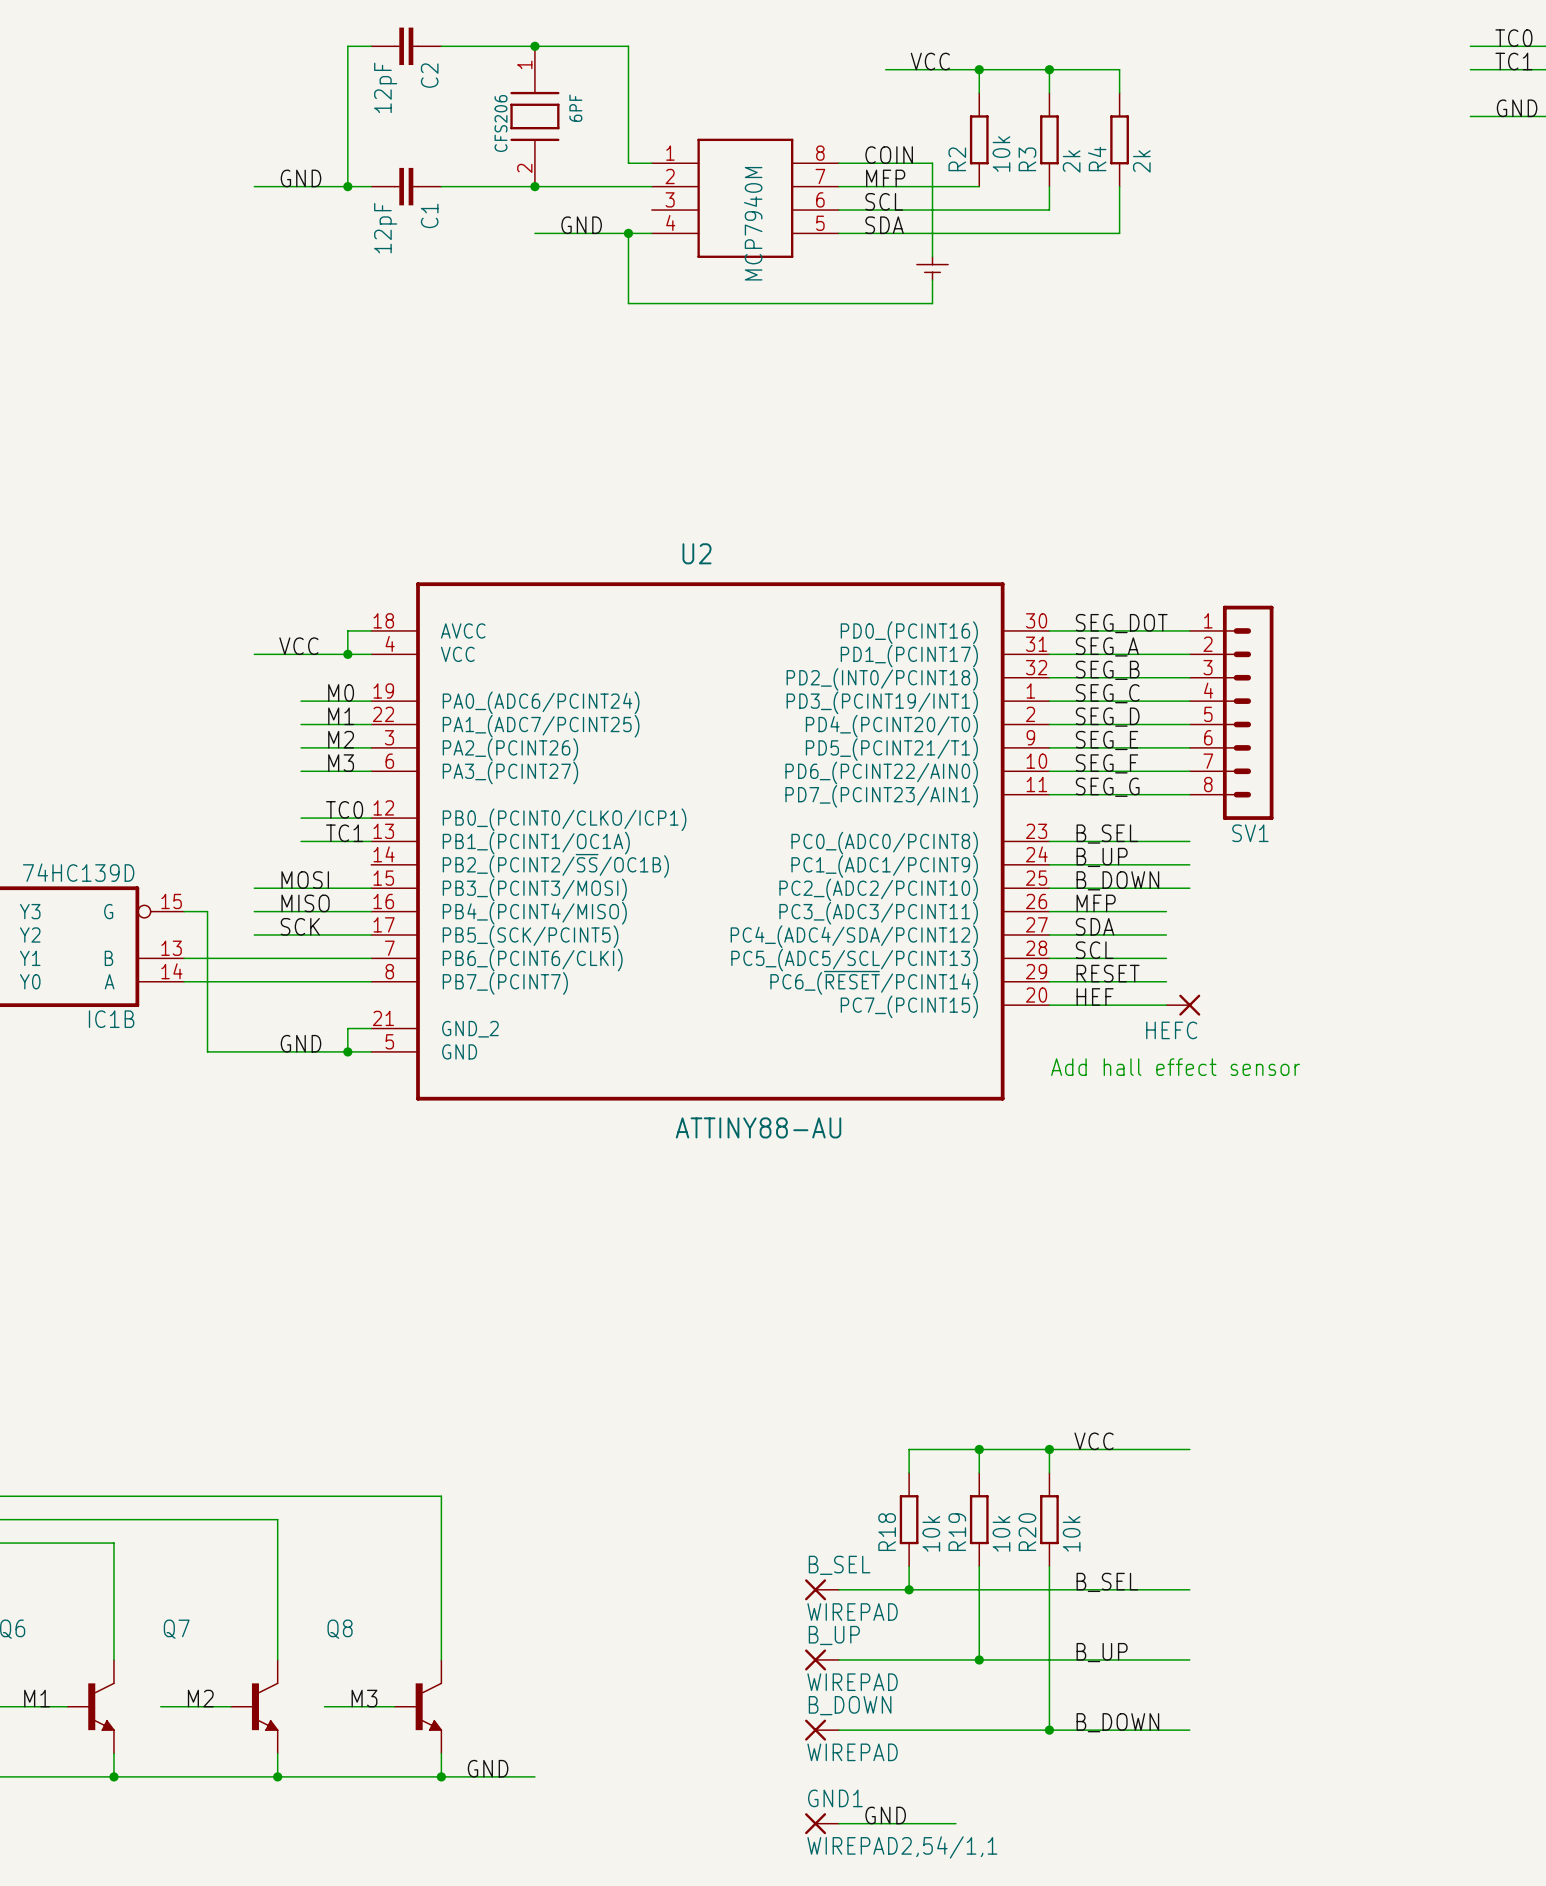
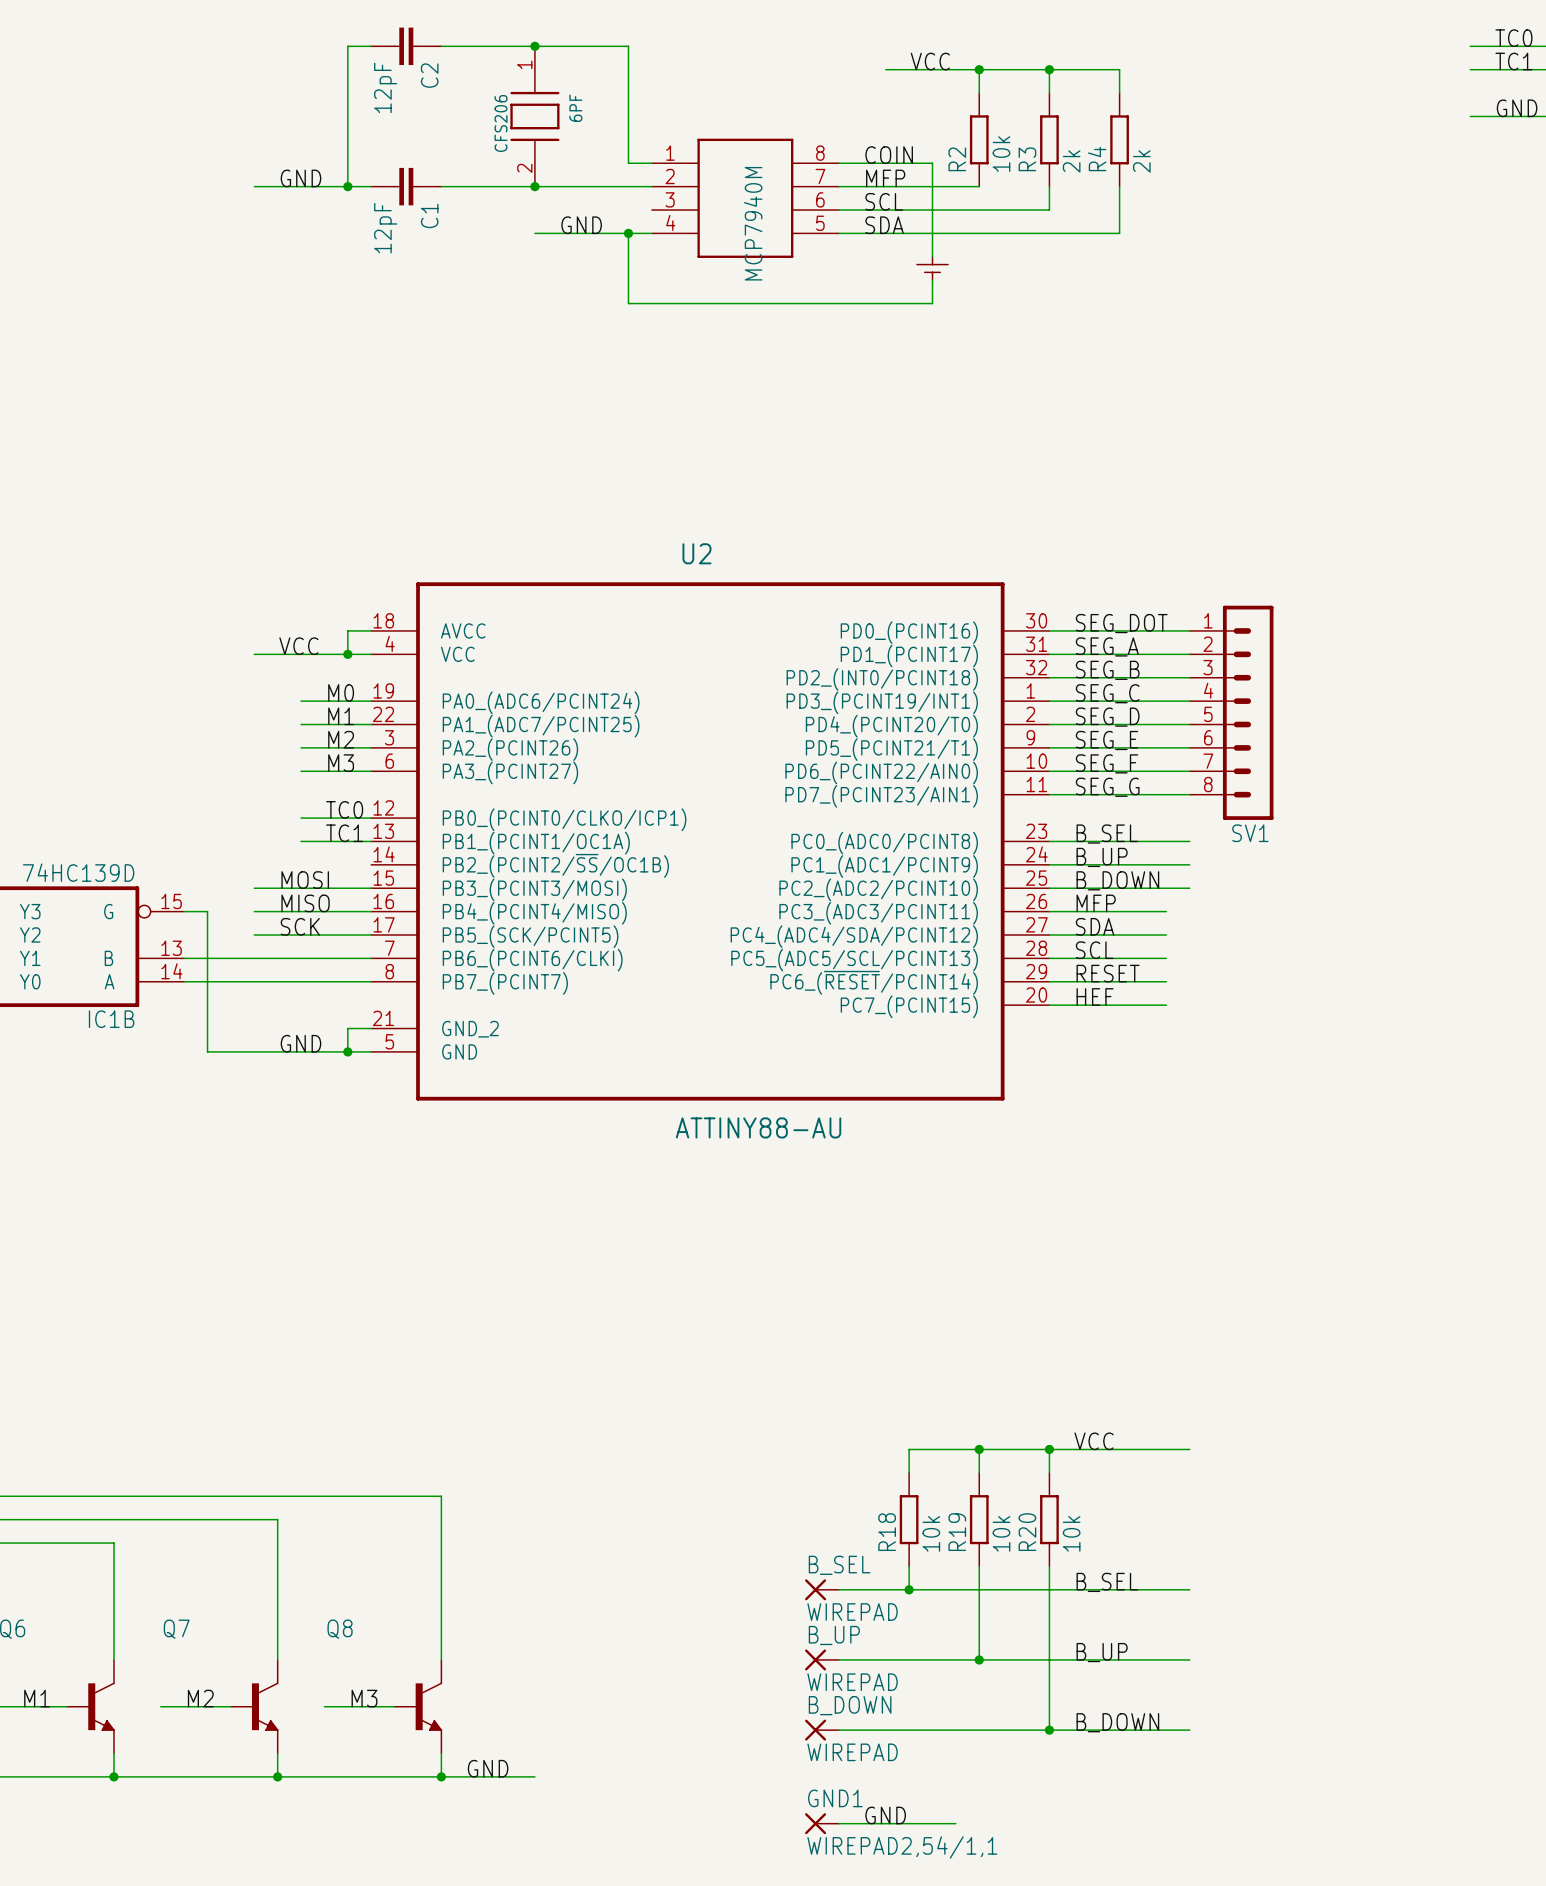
HEFC: (1183, 1005) -> none
text: Add hall effect sensor (1175, 1067) -> none

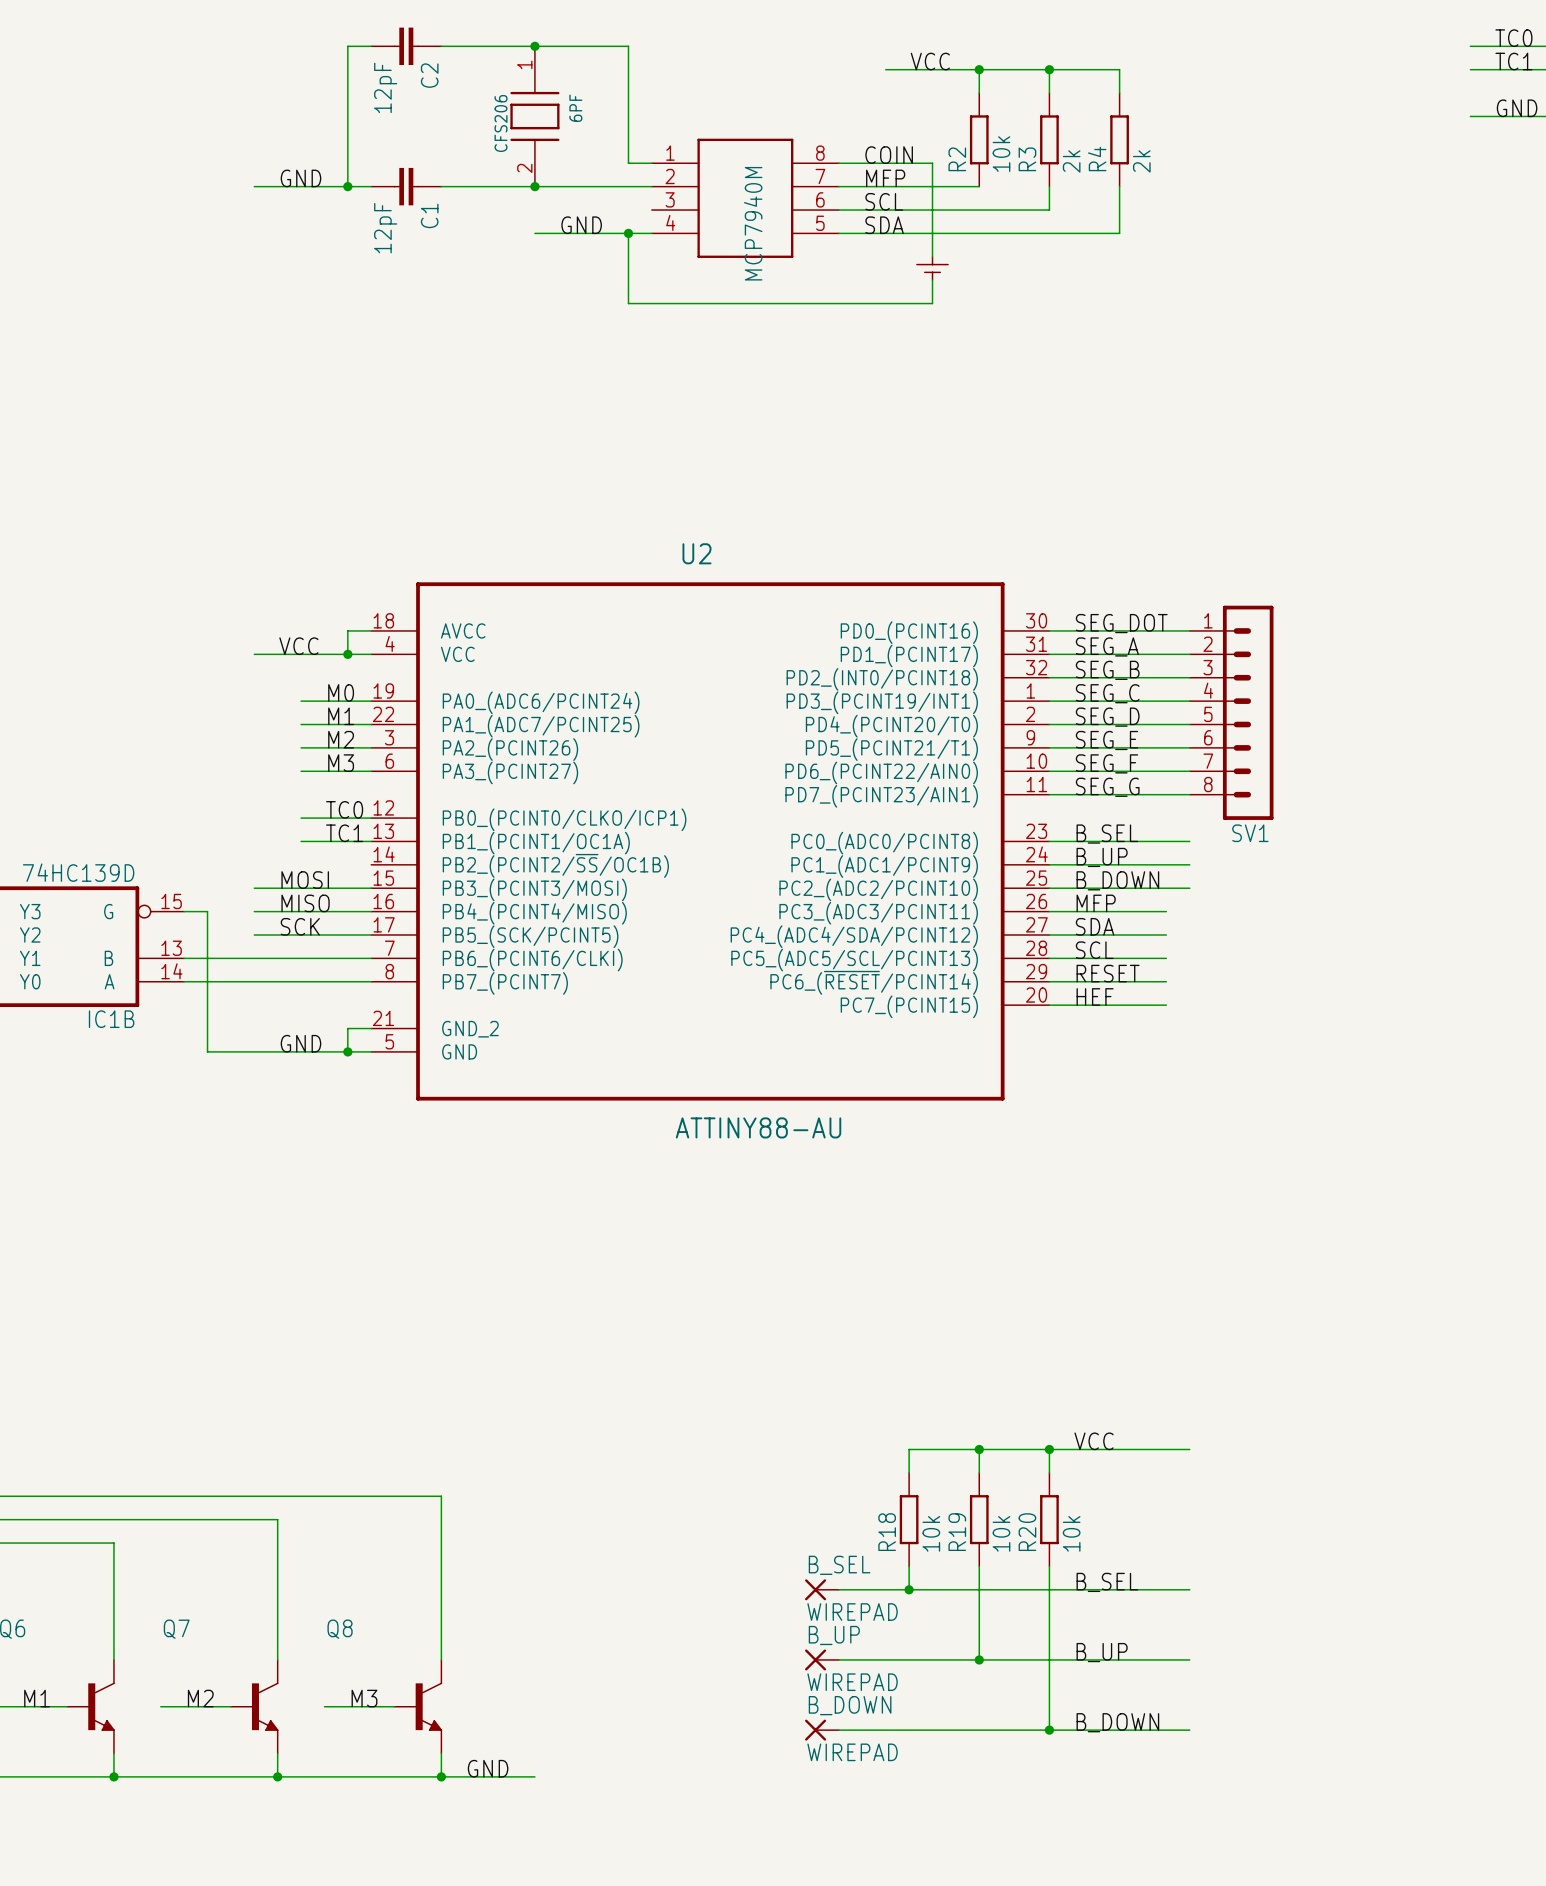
label: GND (885, 1815) -> none
GND1: WIREPAD2,54/1,1 (822, 1823) -> none
wire: (838, 1823) (955, 1823) -> none

